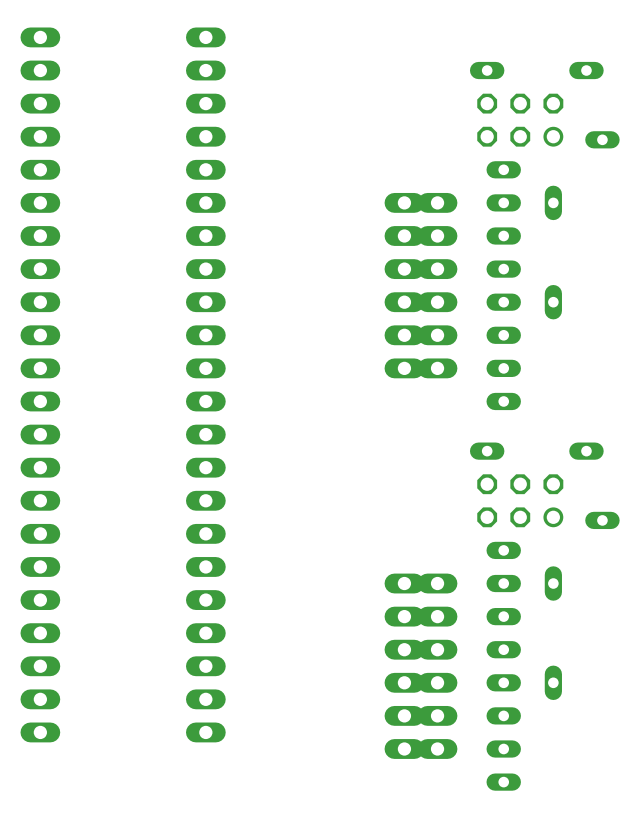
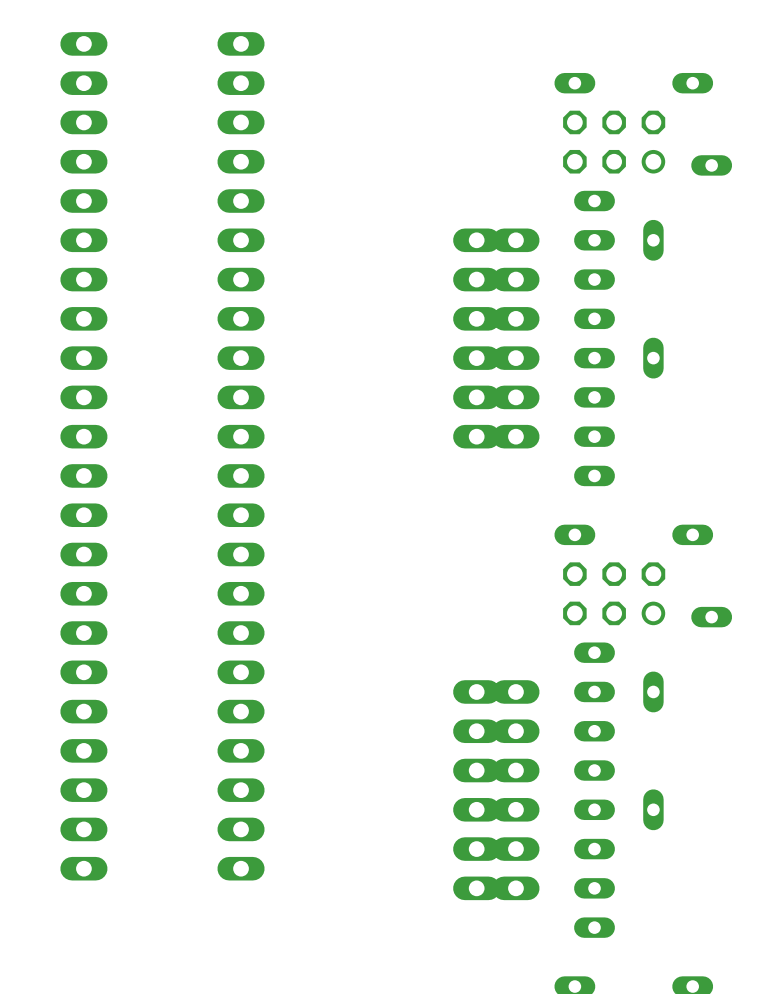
part position: (40, 384) -> (83, 456)

